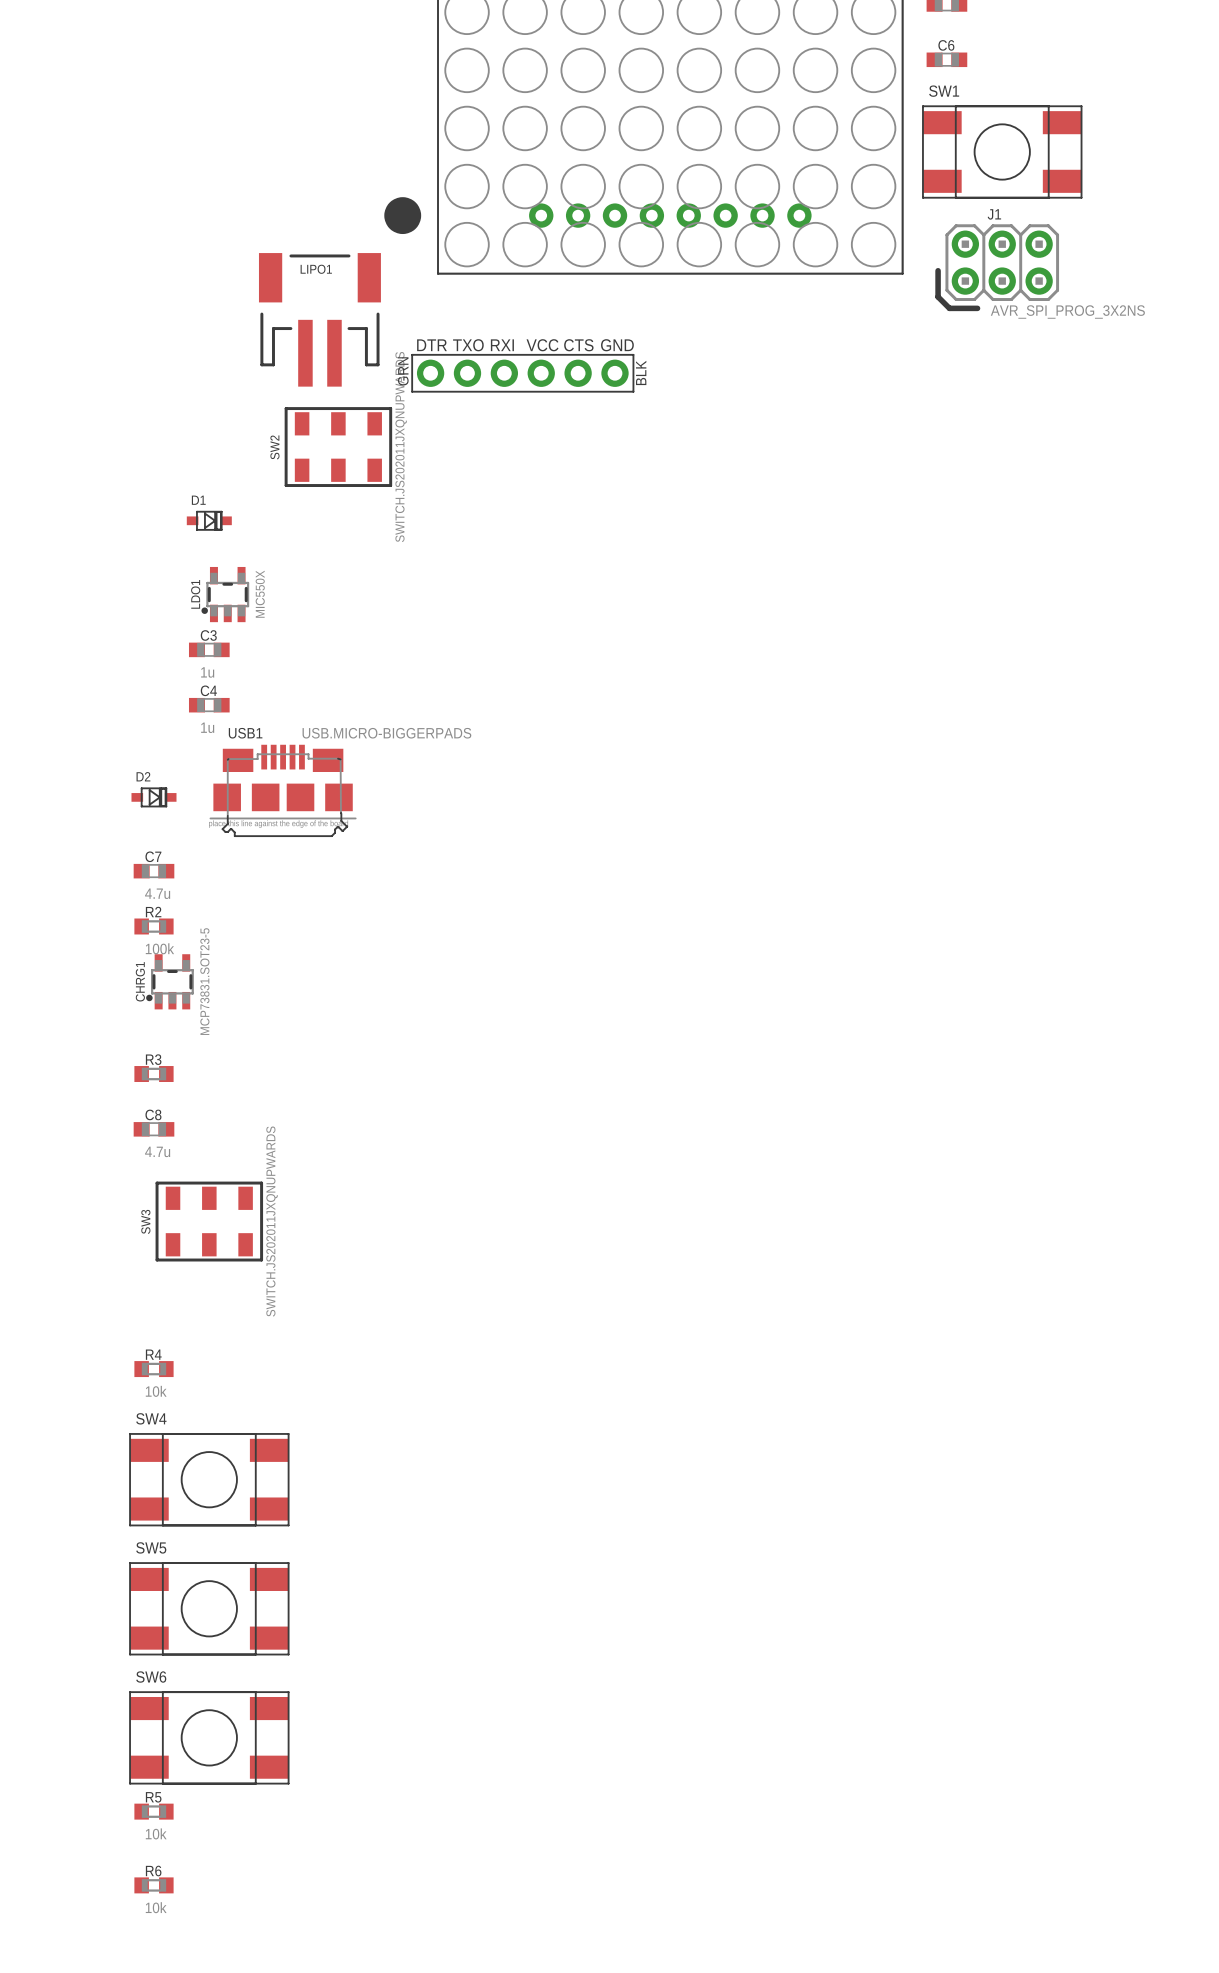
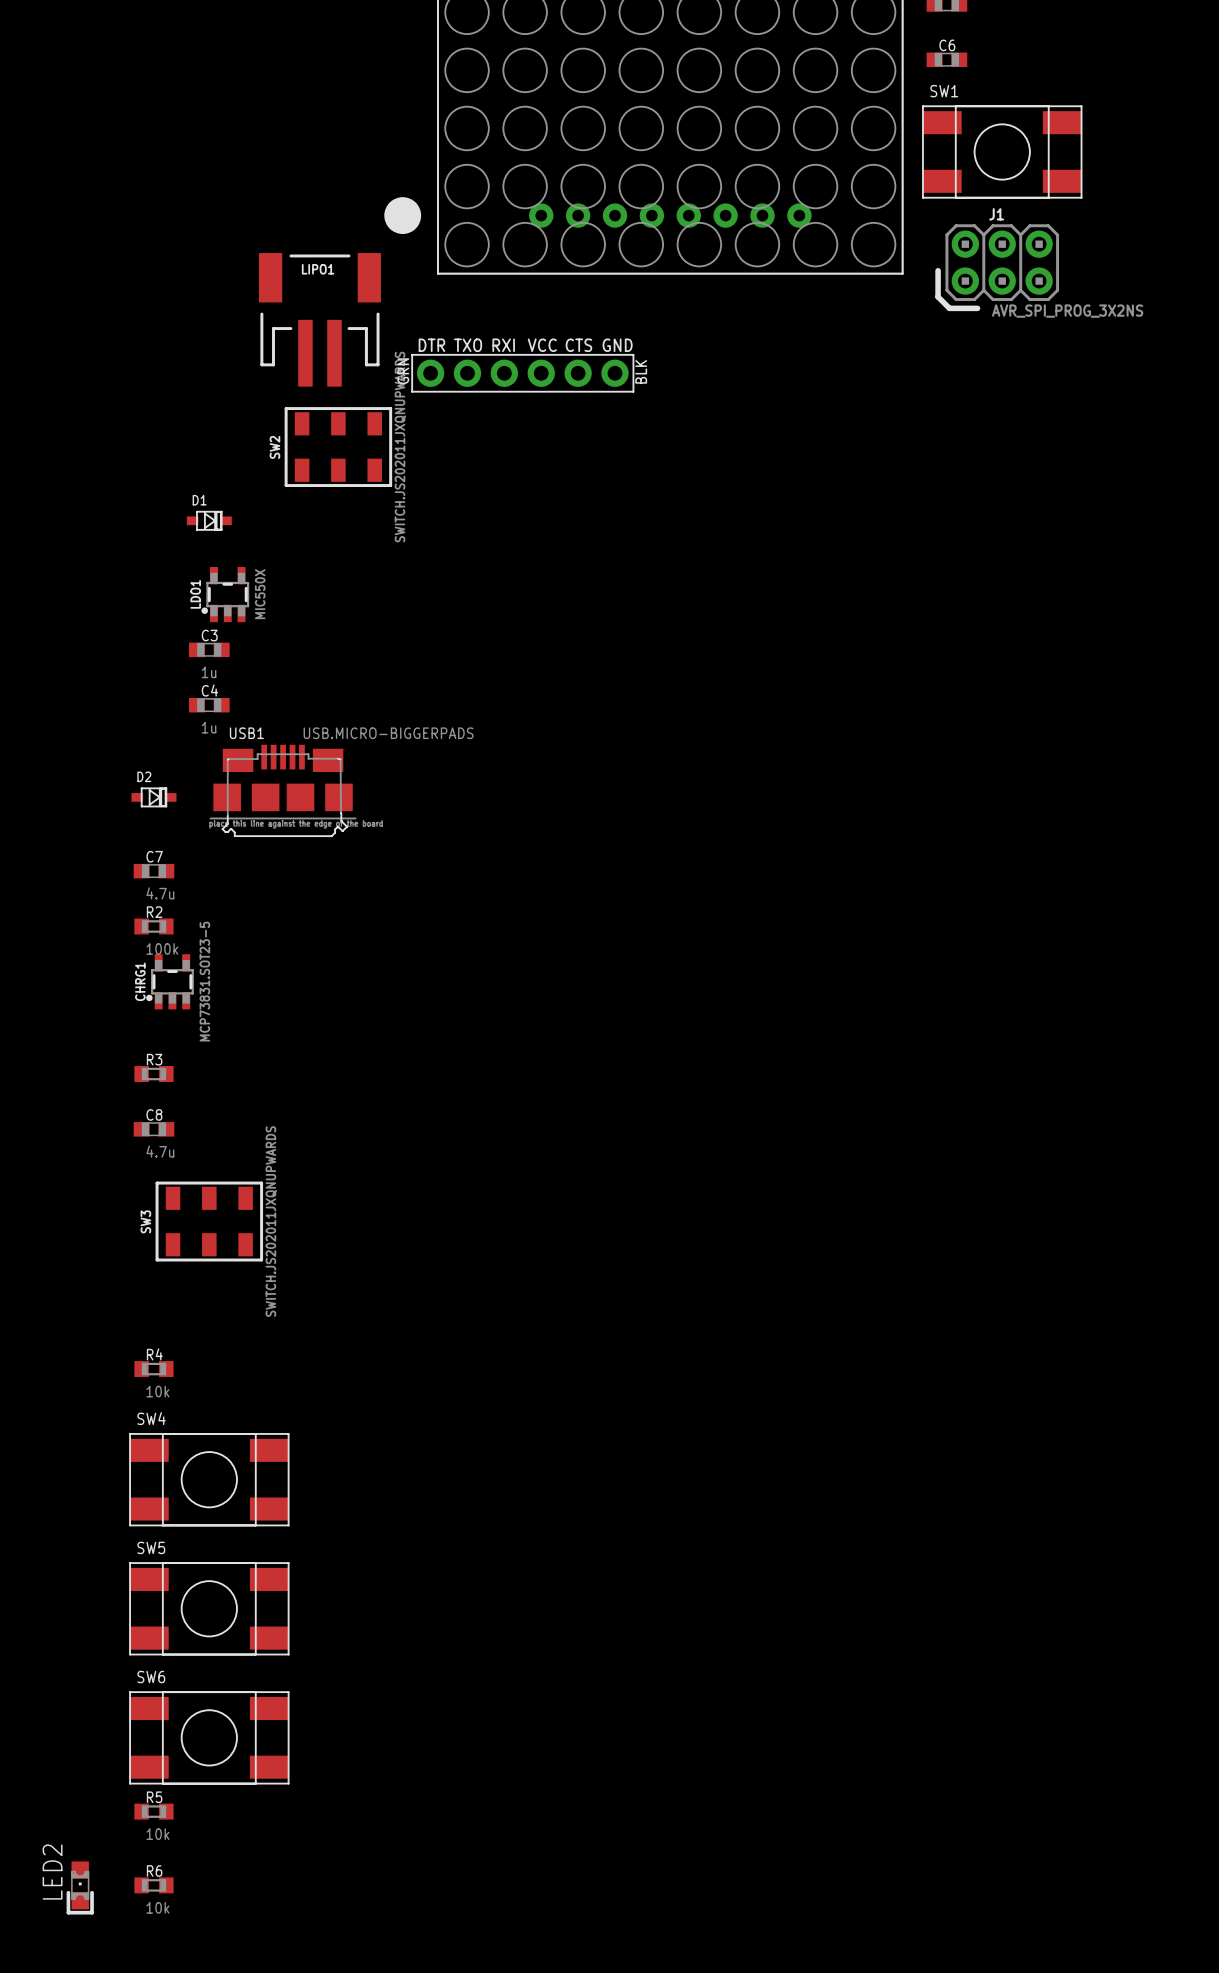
LED2: none -> (80, 1887)

